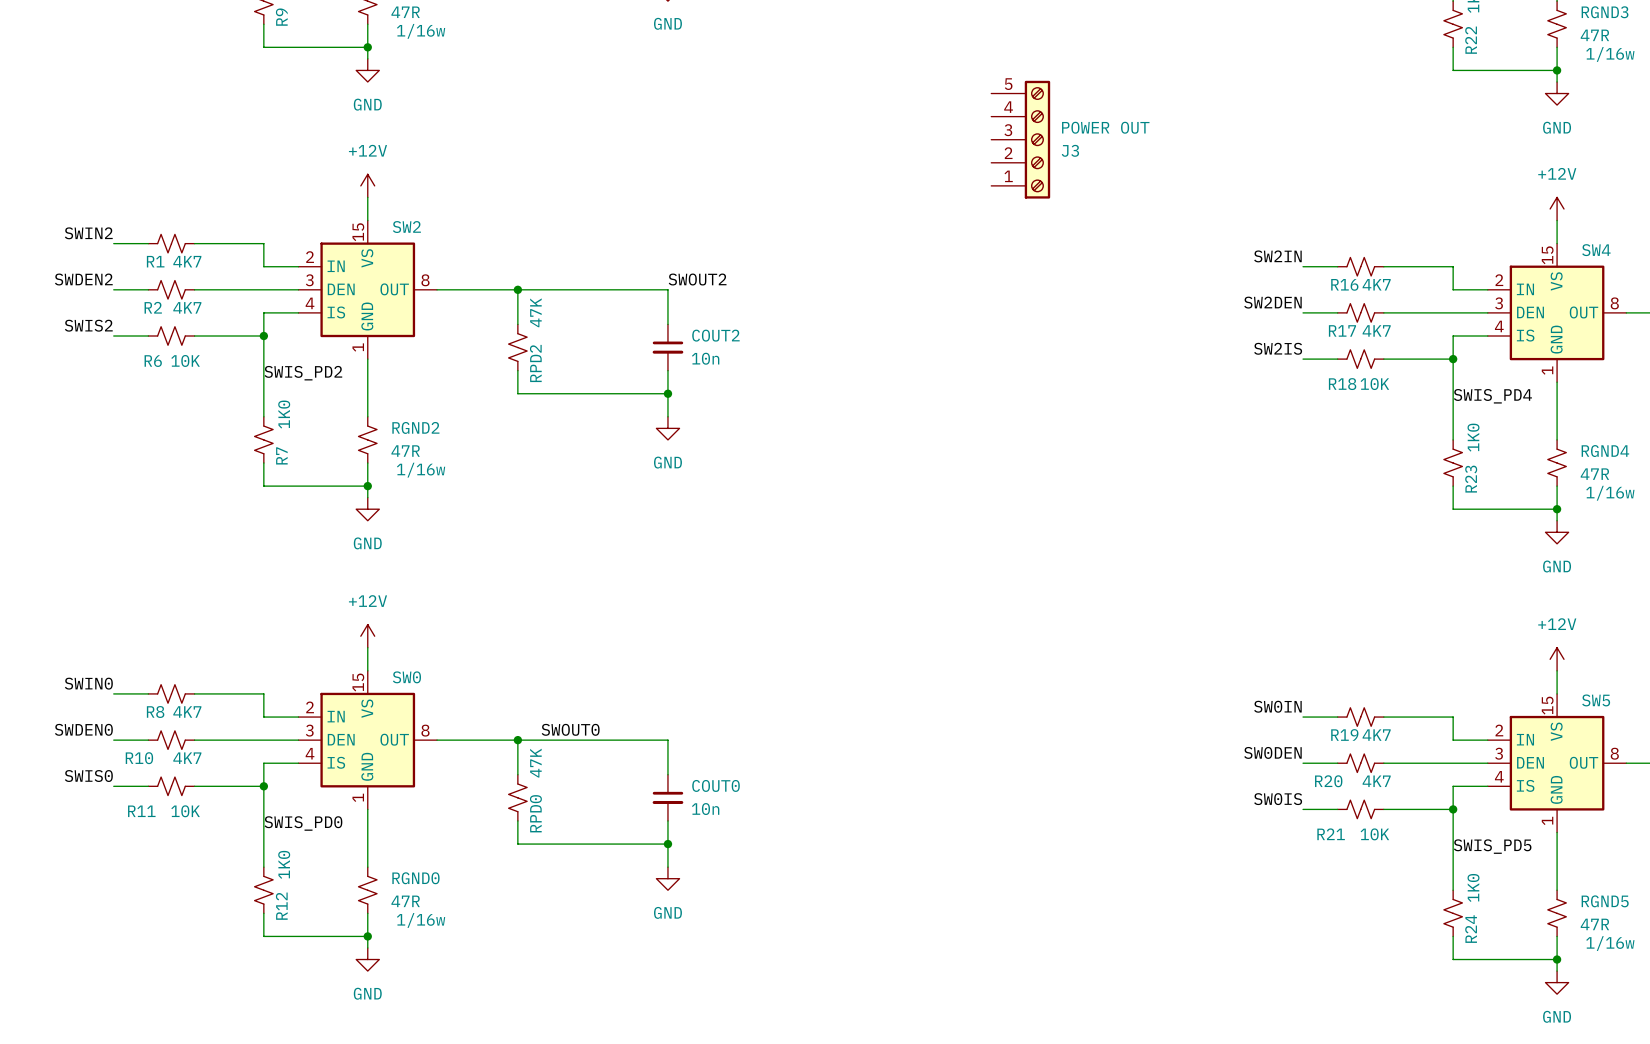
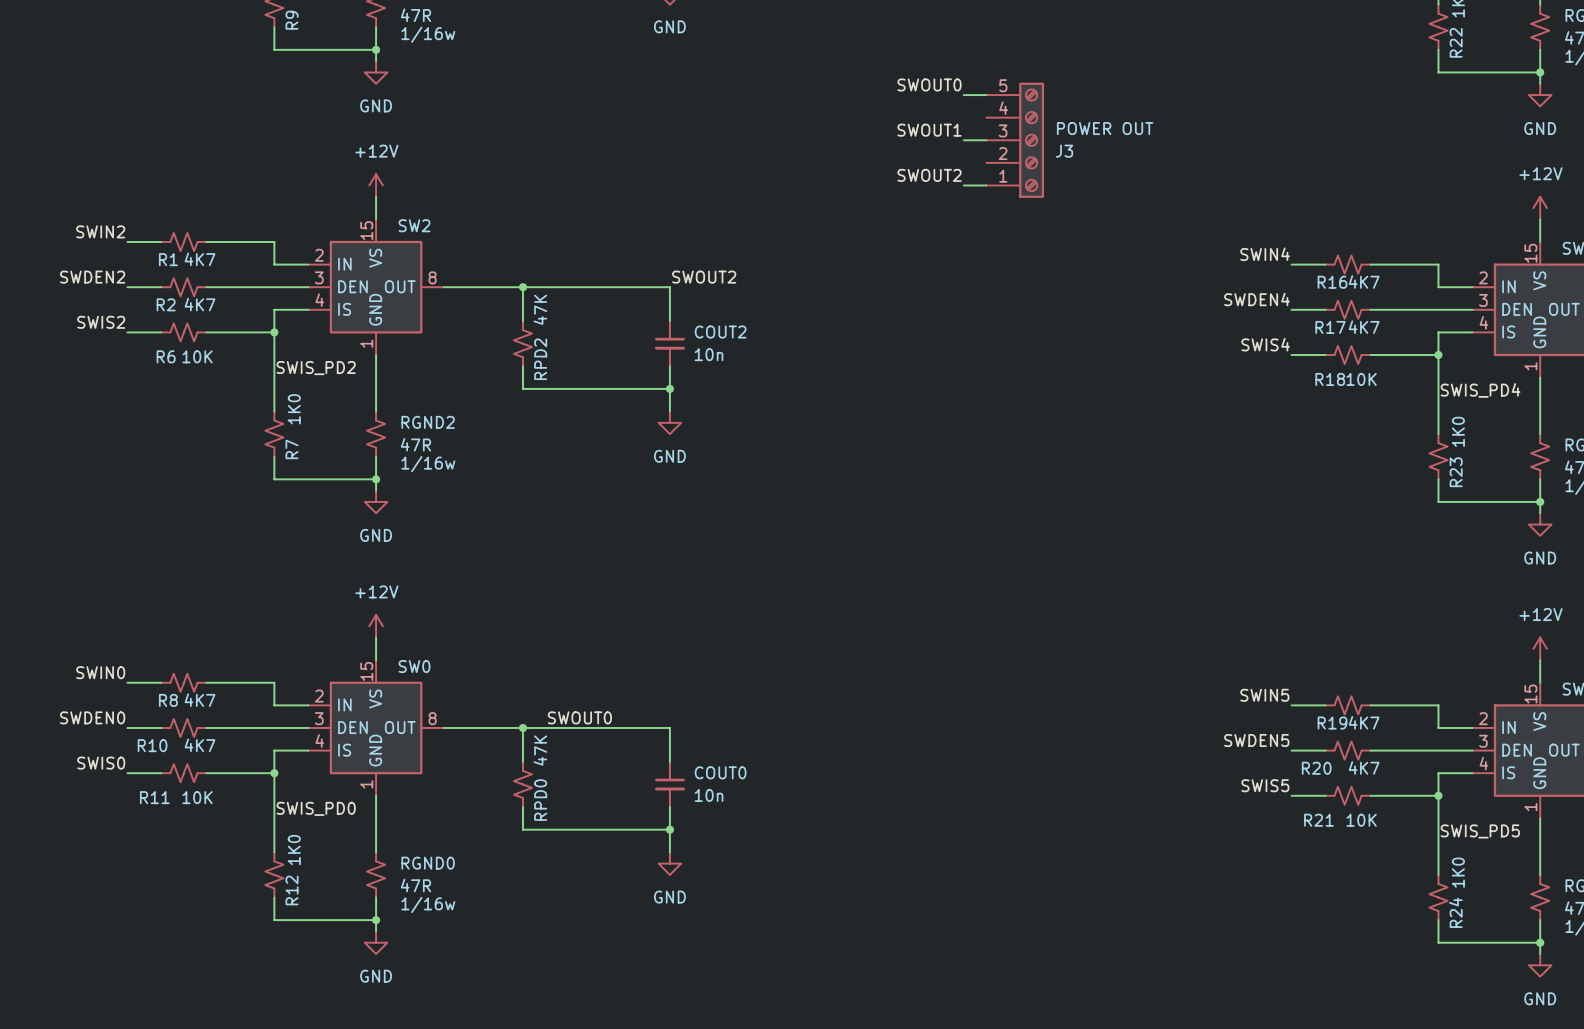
label: none -> SWOUT0 (929, 84)
wire: none -> (963, 95) (986, 95)
label: none -> SWOUT1 (929, 130)
wire: none -> (963, 140) (986, 140)
label: none -> SWOUT2 (929, 175)
wire: none -> (963, 185) (986, 185)
label: SW2IN (1277, 256) -> SWIN4 (1265, 254)
label: SW2DEN (1272, 302) -> SWDEN4 (1257, 299)
label: SW2IS (1278, 348) -> SWIS4 (1265, 344)
label: SW0IN (1277, 706) -> SWIN5 (1264, 695)
label: SW0DEN (1272, 752) -> SWDEN5 (1256, 740)
label: SW0IS (1278, 799) -> SWIS5 (1265, 785)

